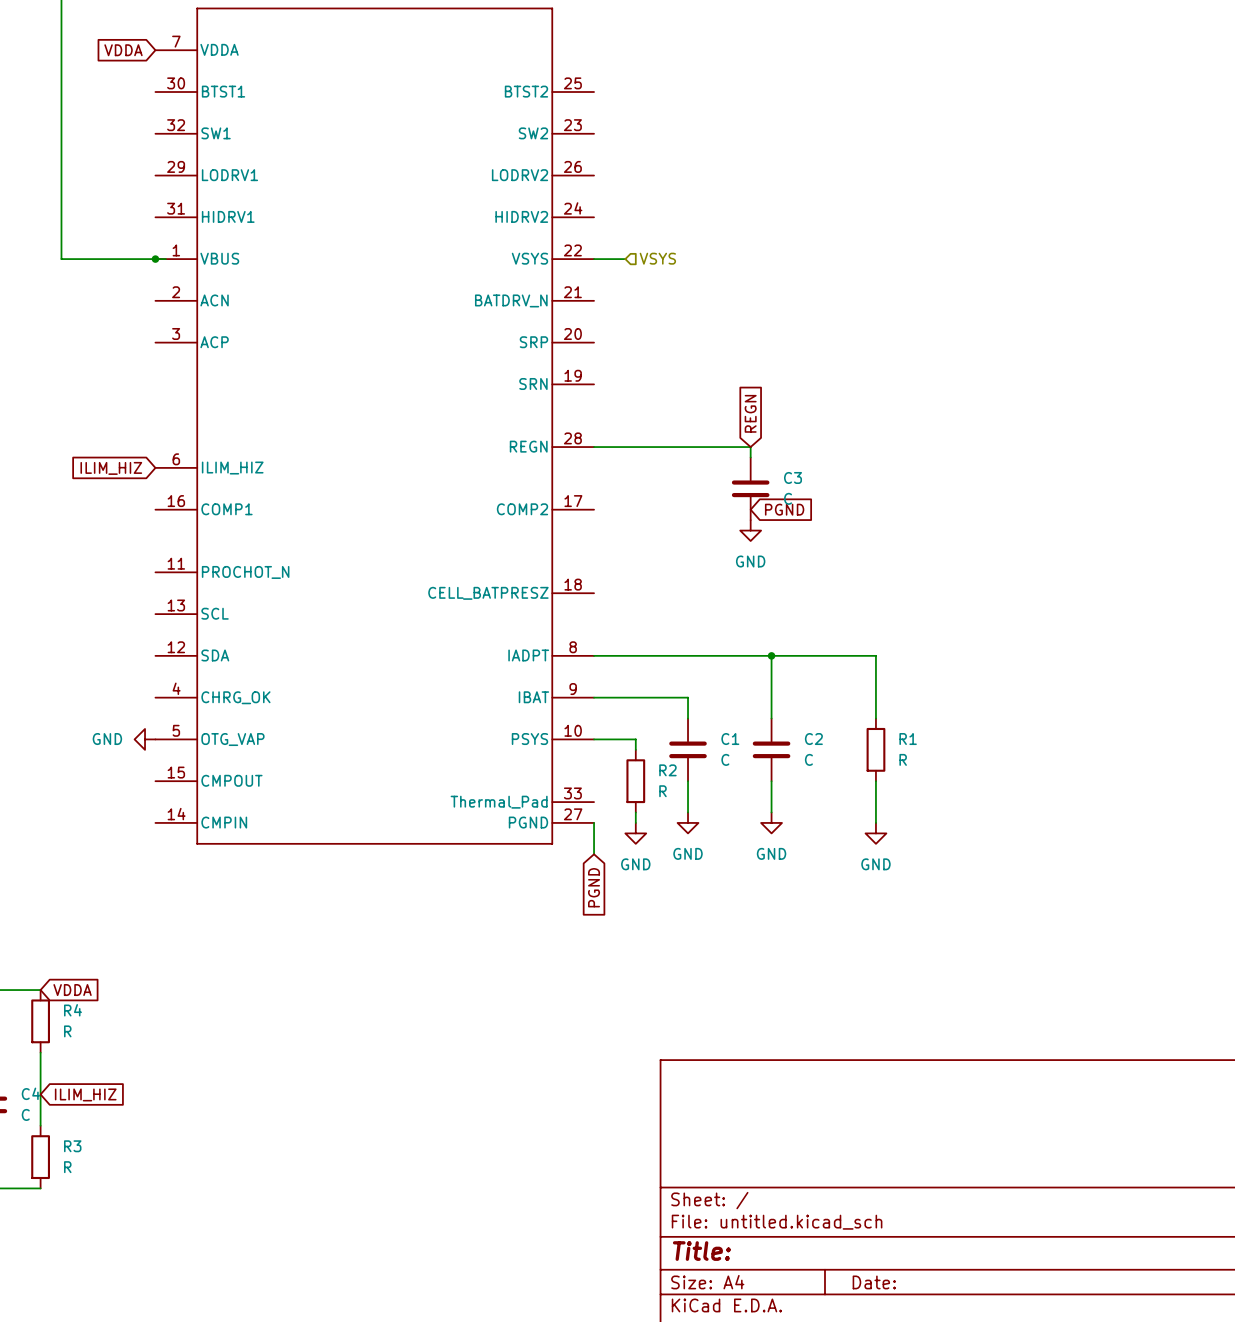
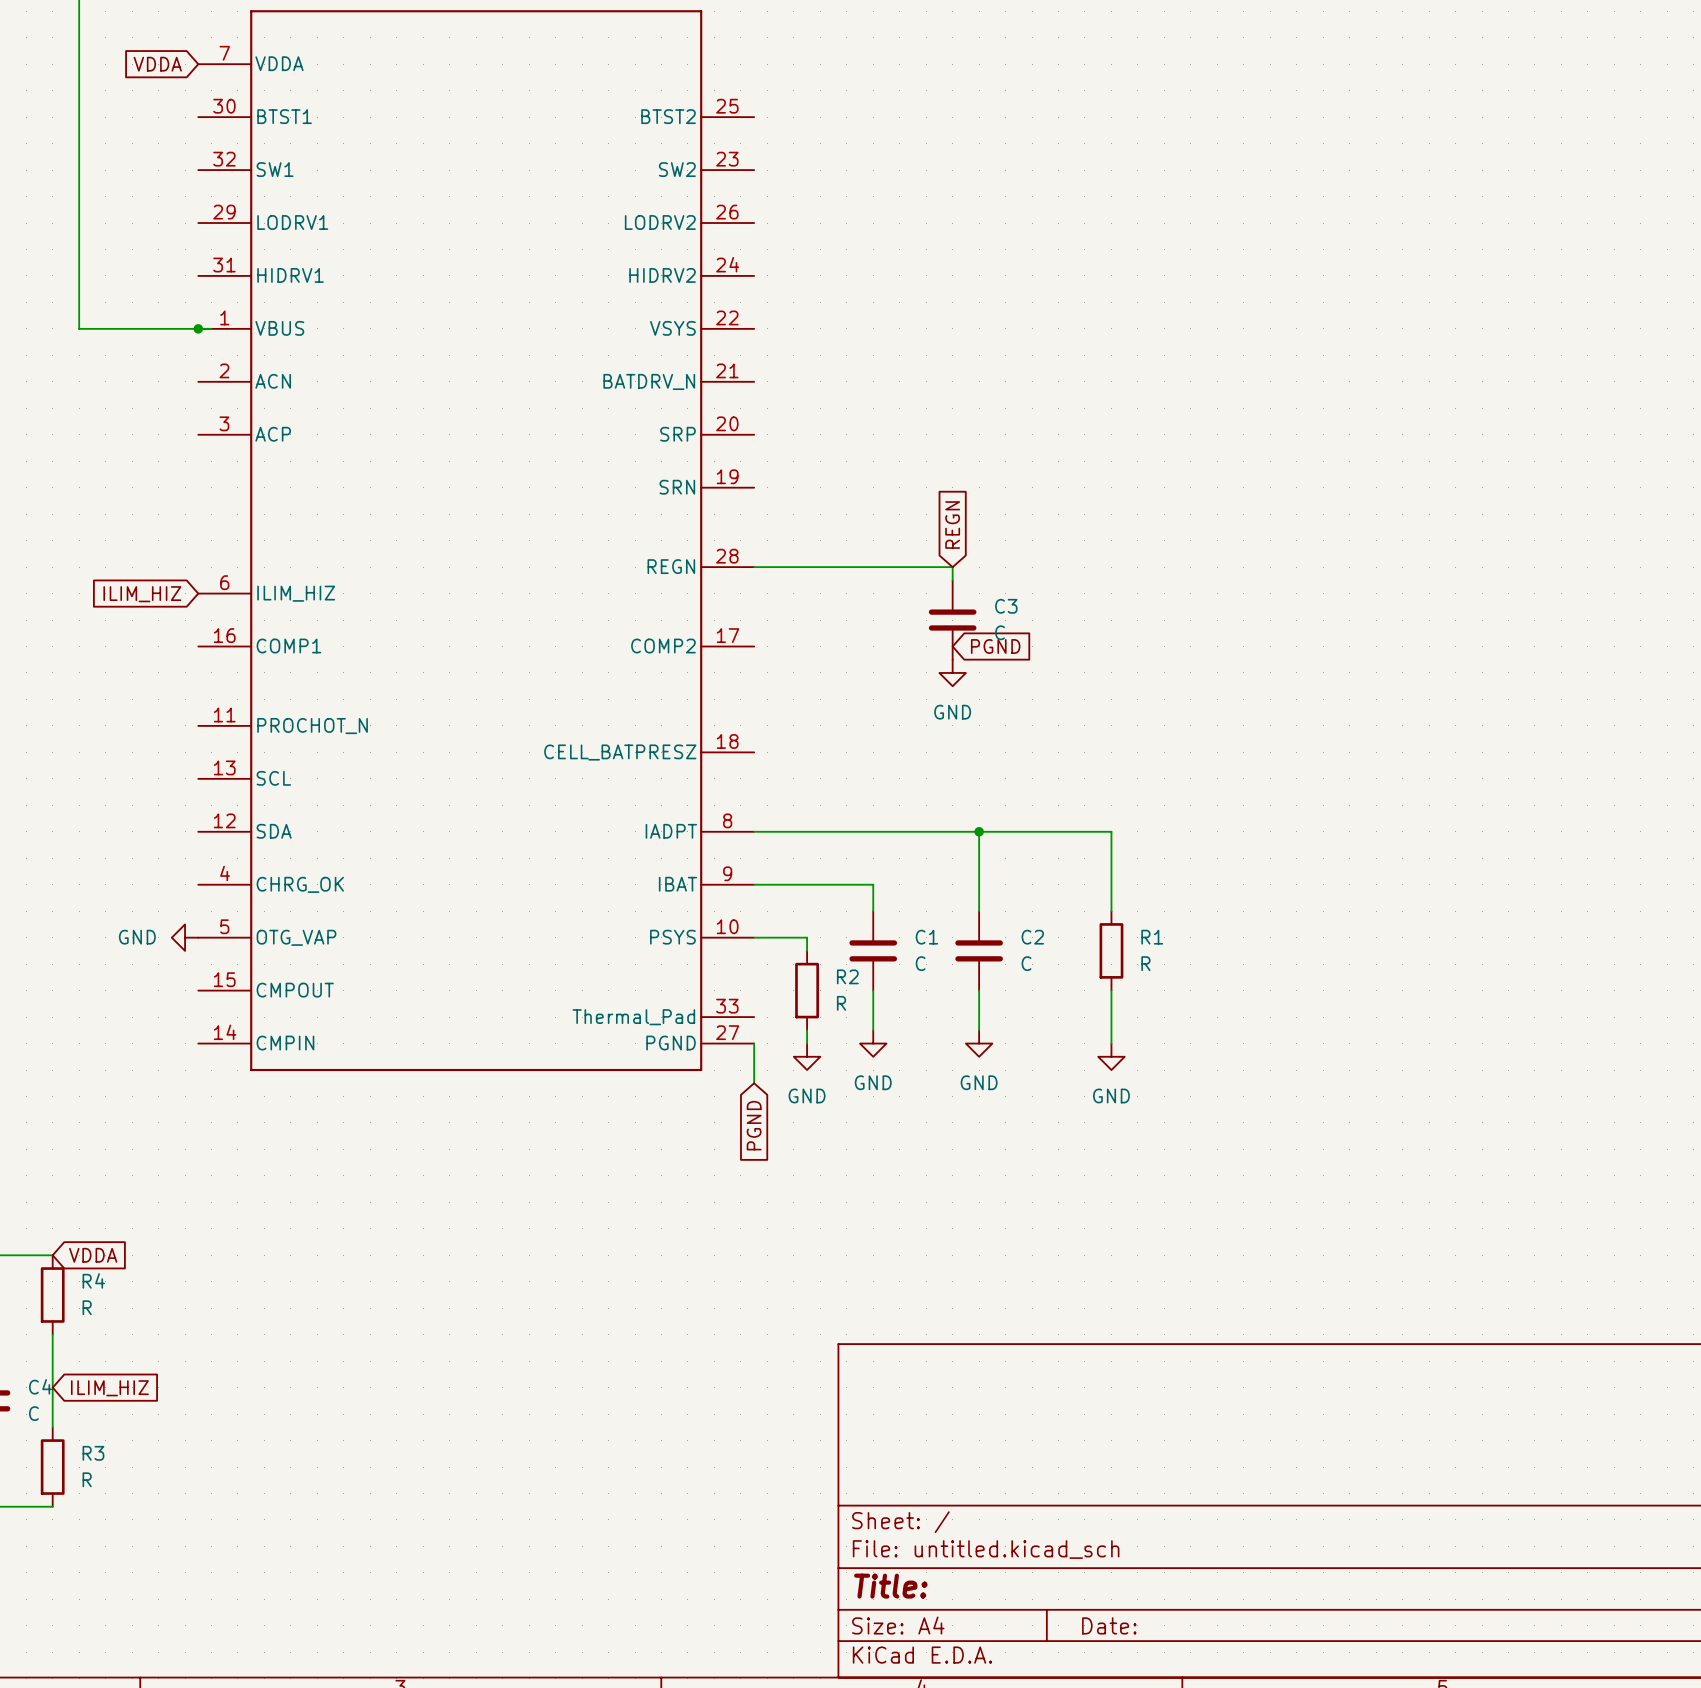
hierarchical label: VSYS (657, 258) -> none
wire: (594, 259) (625, 259) -> none

